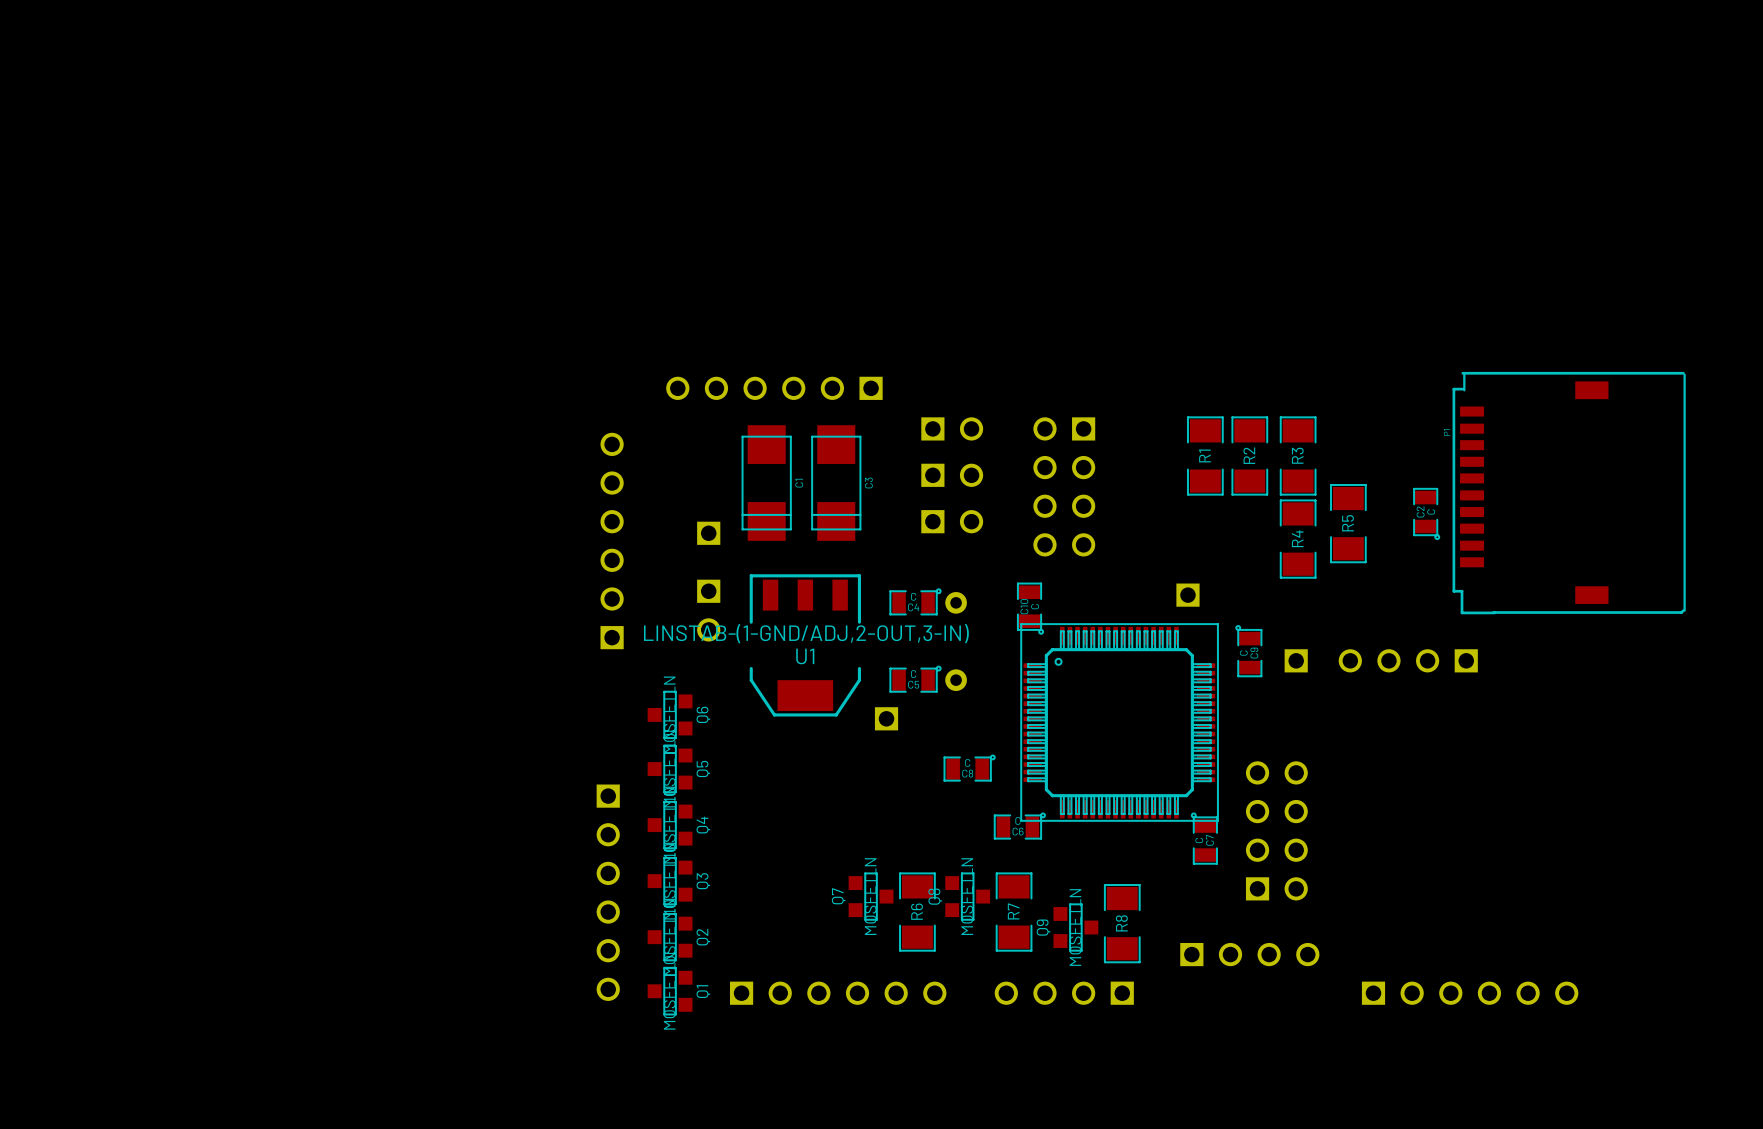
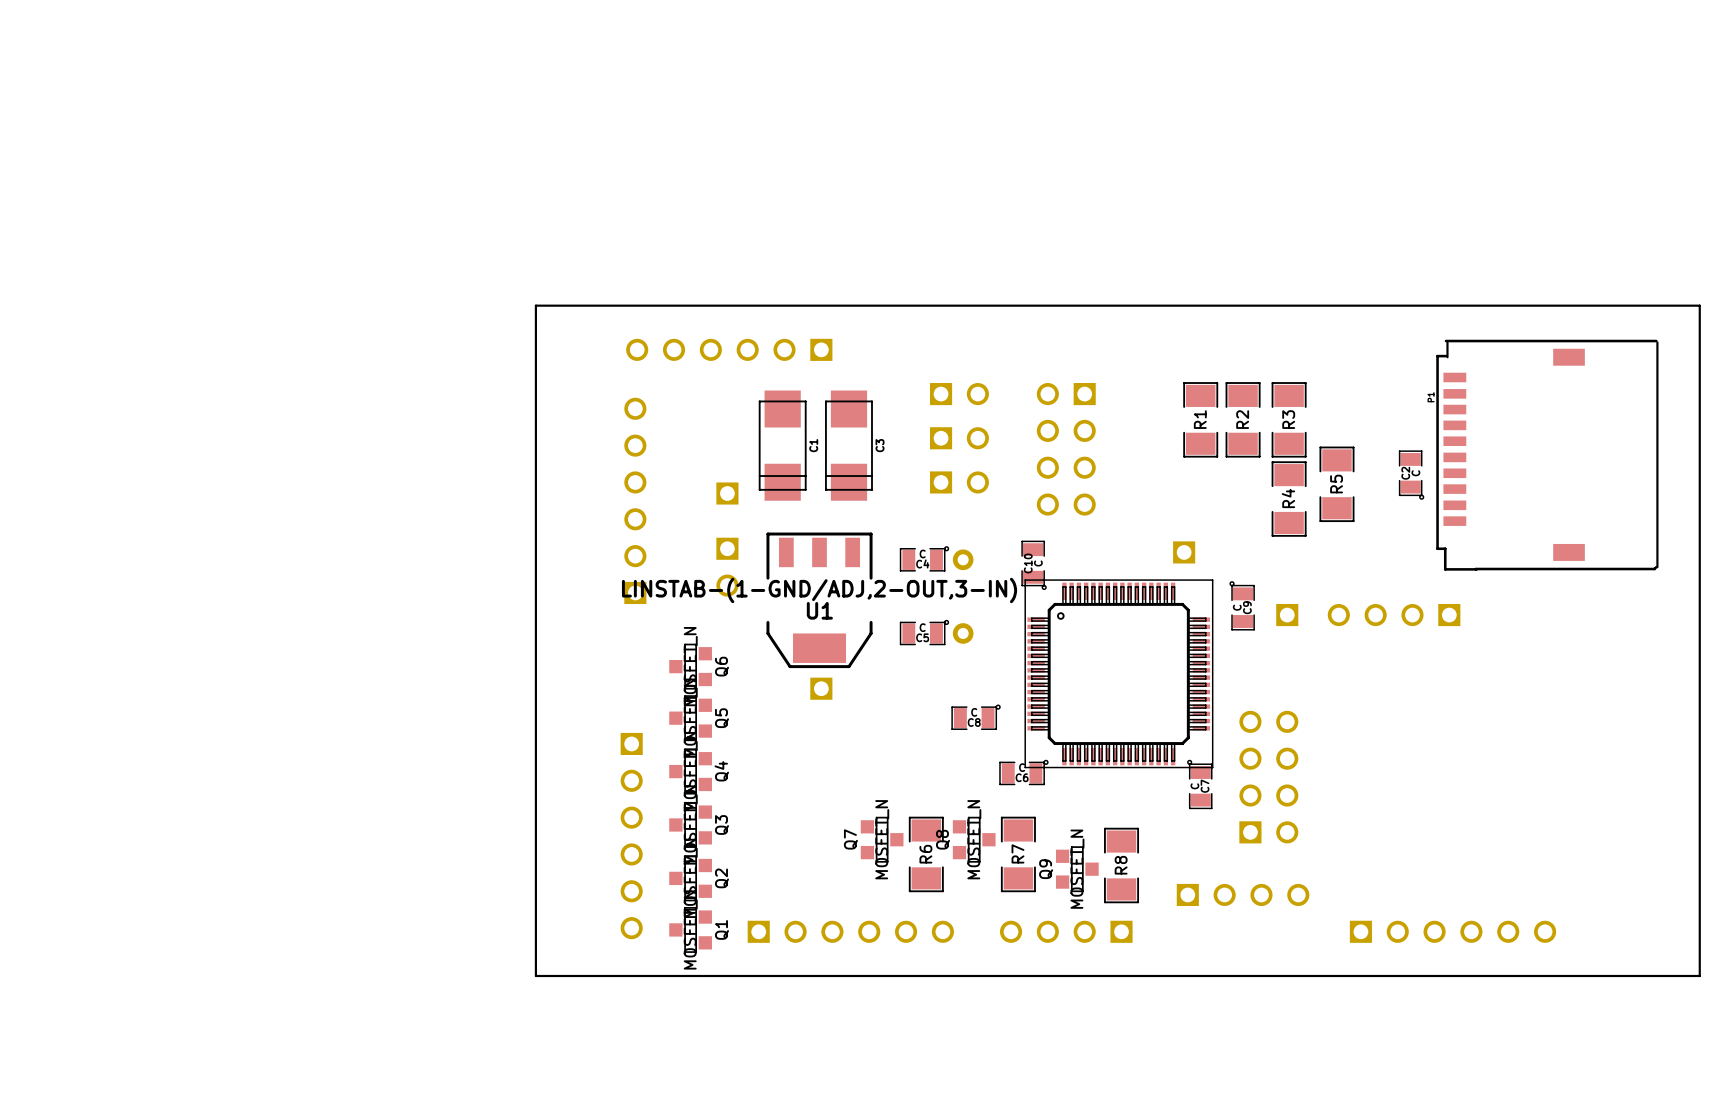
board edge: none -> (535, 305) (535, 975) (1699, 975) (1699, 305) (535, 305)
part position: (774, 388) -> (729, 349)
part position: (886, 718) -> (821, 688)

